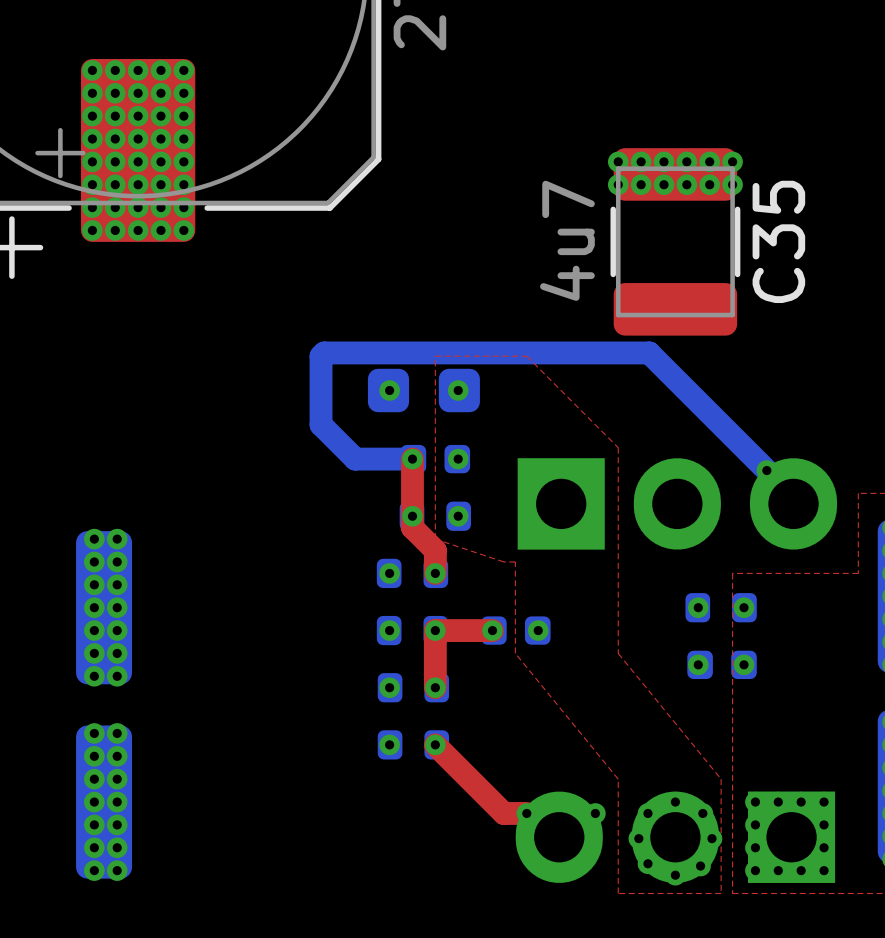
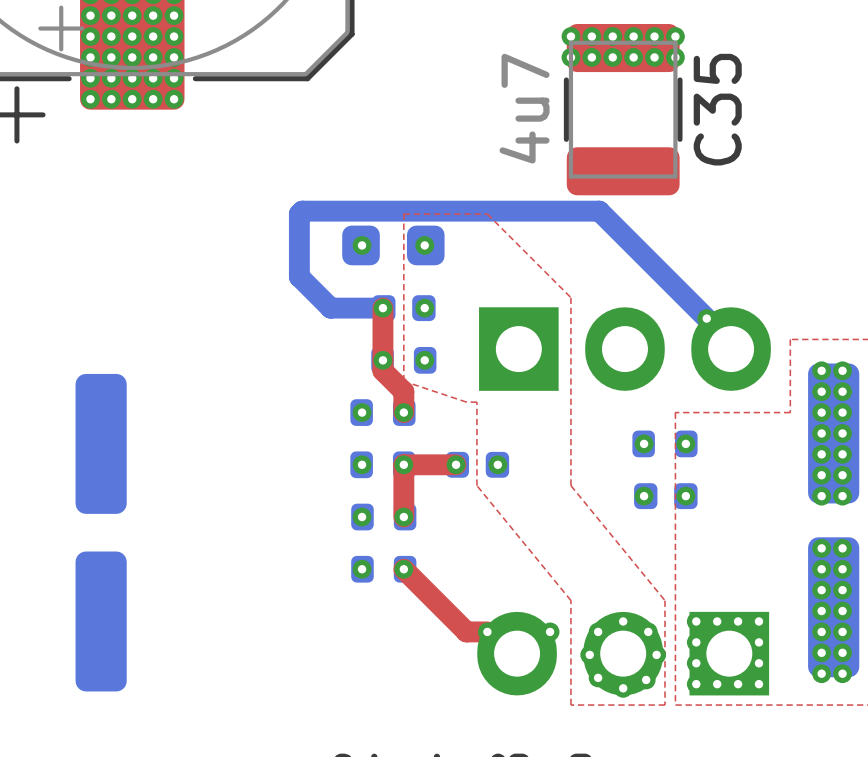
via: (94, 539) -> none
via: (117, 539) -> none
via: (94, 561) -> none
via: (117, 561) -> none
via: (94, 584) -> none
via: (117, 584) -> none
via: (94, 607) -> none
via: (117, 607) -> none
via: (94, 630) -> none
via: (117, 630) -> none
via: (94, 653) -> none
via: (117, 653) -> none
via: (94, 676) -> none
via: (117, 676) -> none
via: (94, 733) -> none
via: (117, 733) -> none
via: (94, 756) -> none
via: (117, 756) -> none
via: (94, 779) -> none
via: (117, 779) -> none
via: (94, 802) -> none
via: (117, 802) -> none
via: (94, 824) -> none
via: (117, 824) -> none
via: (94, 847) -> none
via: (117, 847) -> none
via: (94, 870) -> none
via: (117, 870) -> none

